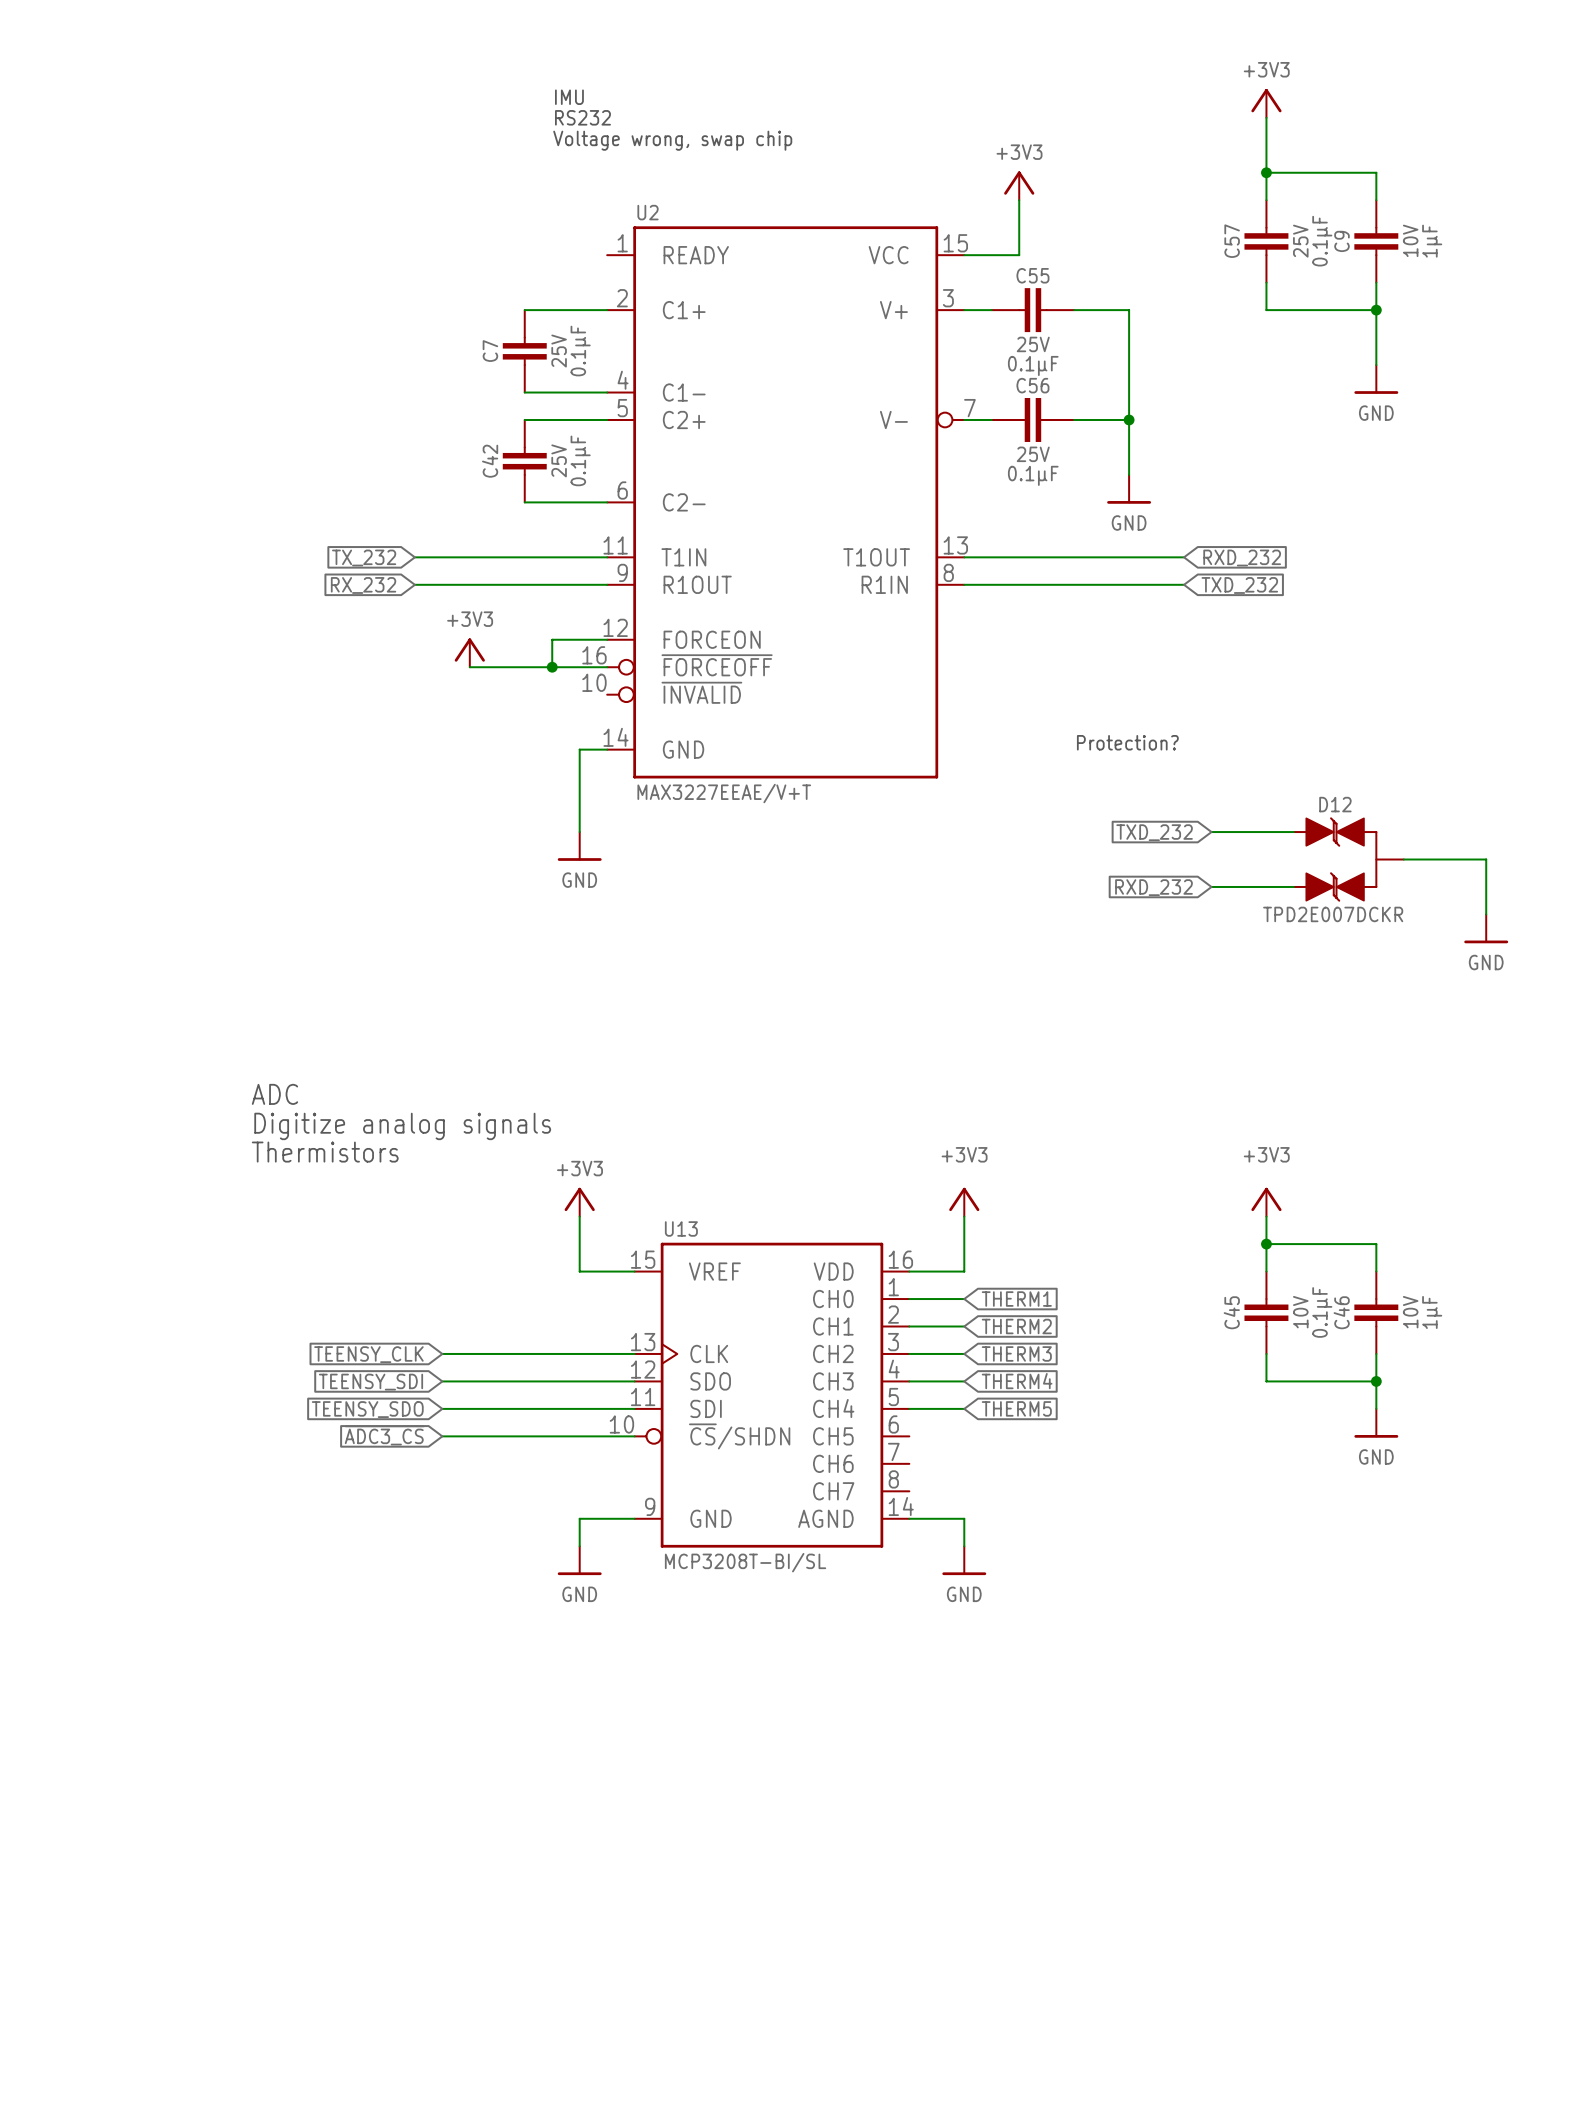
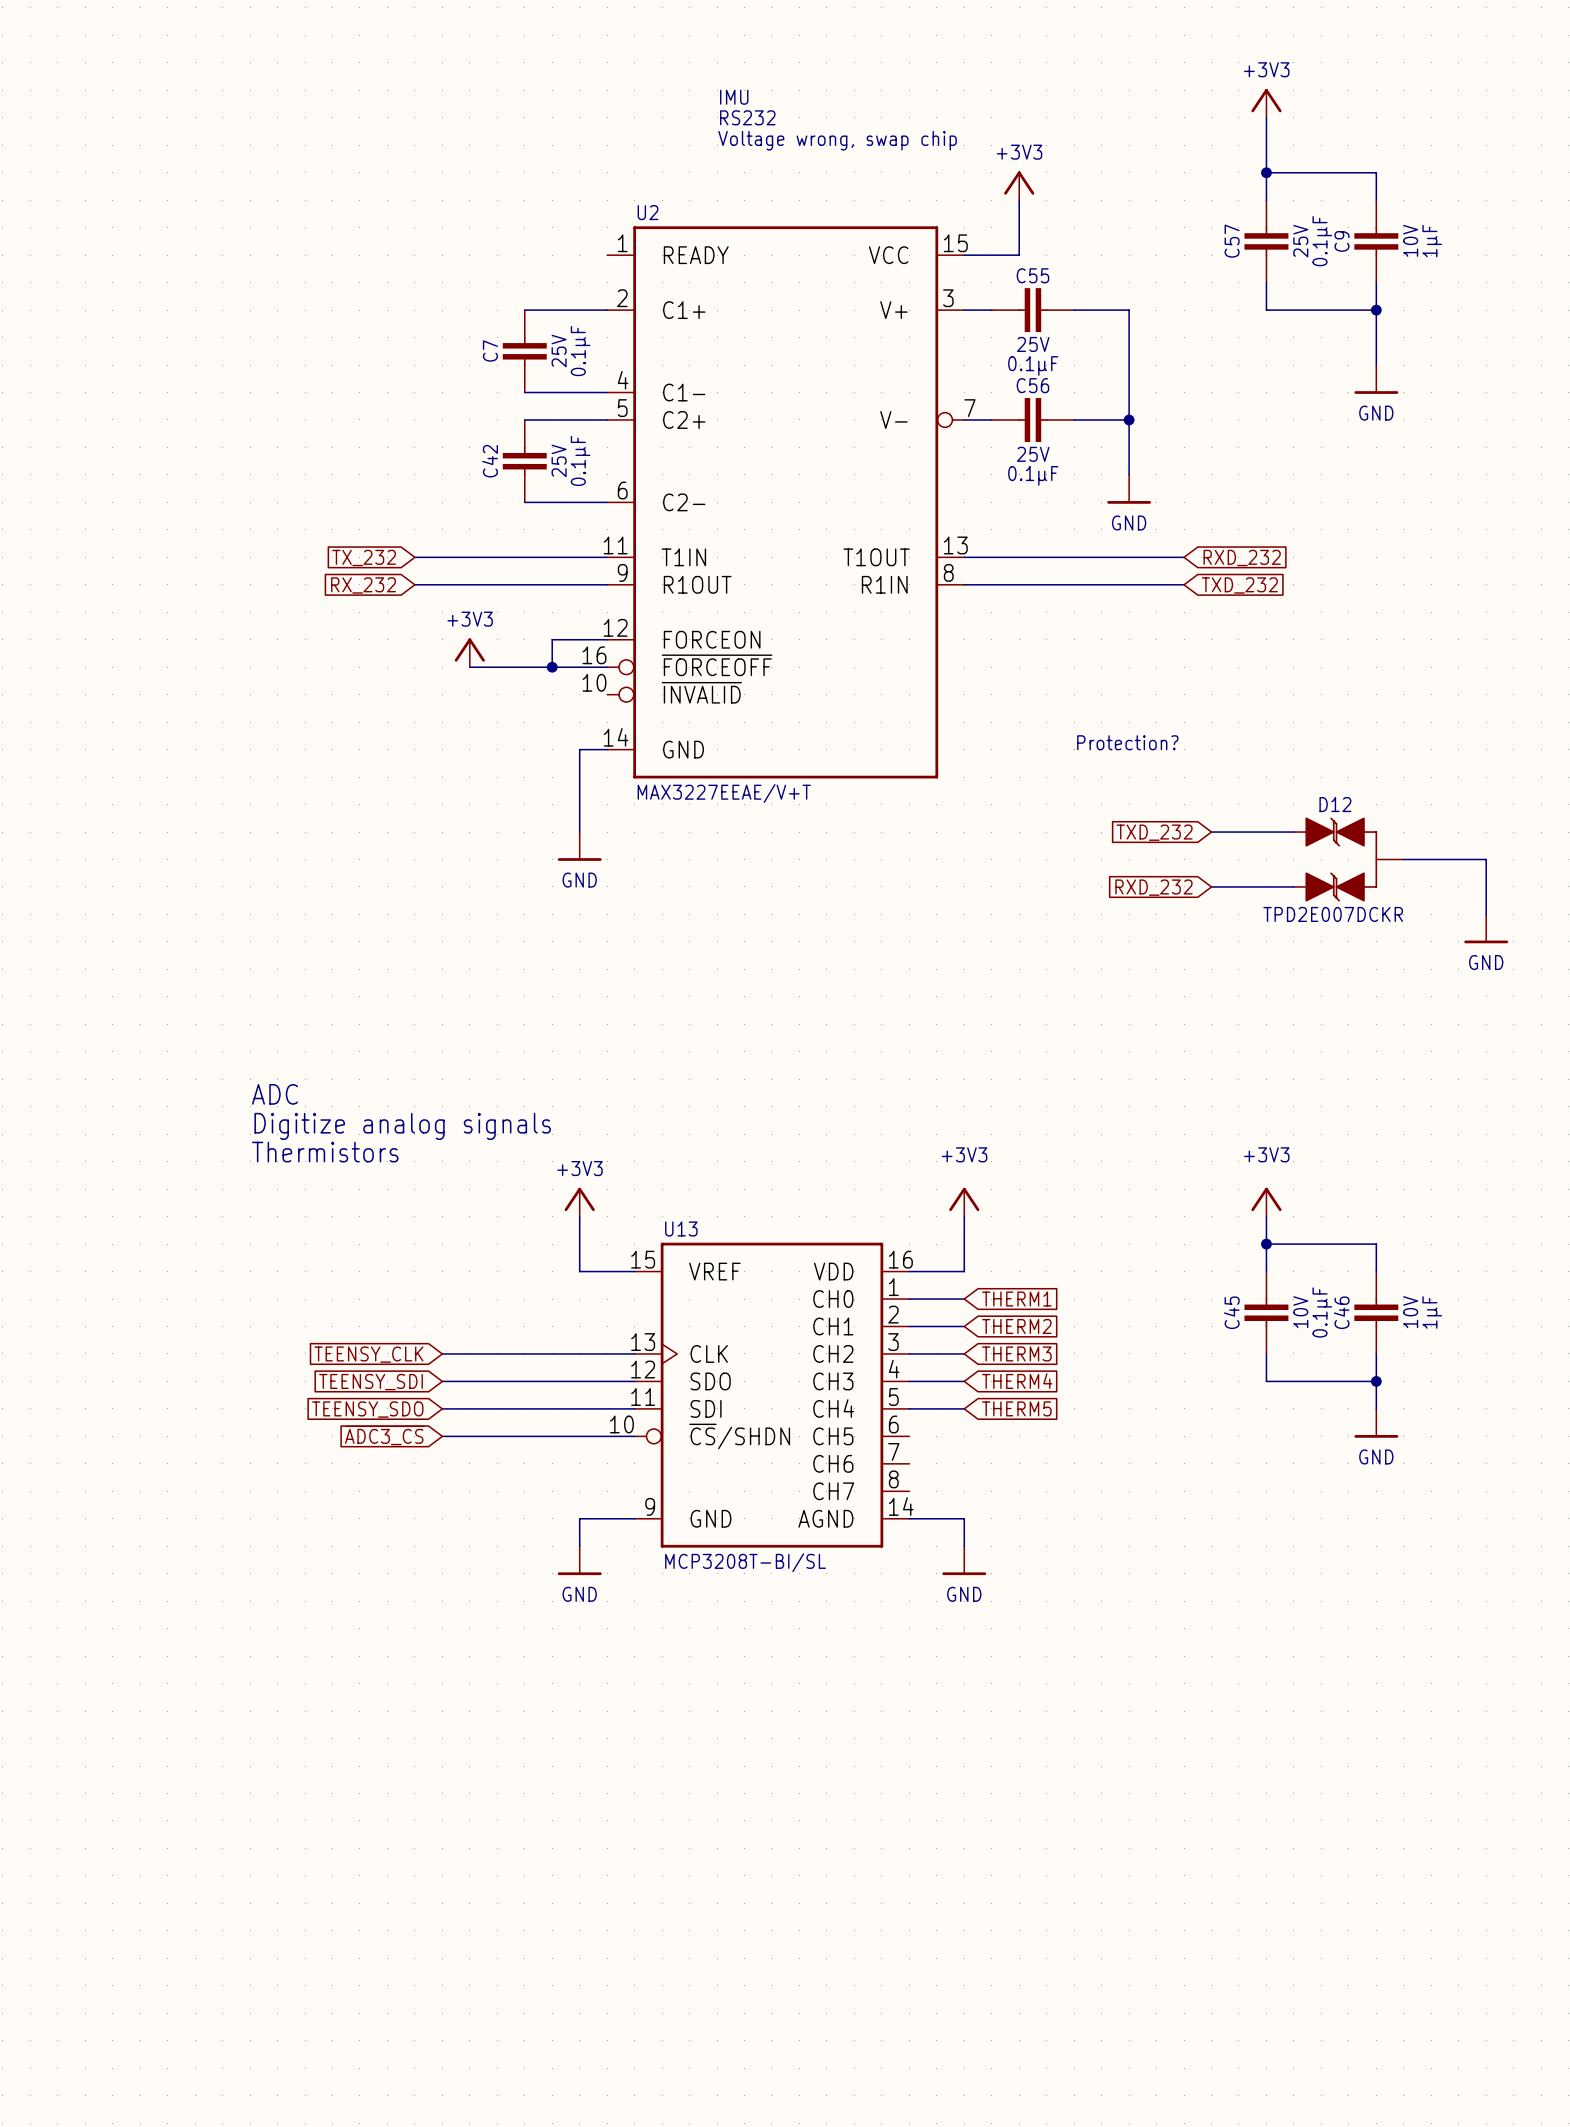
text position: IMU (569, 97) -> IMU (734, 97)
text position: RS232 (582, 117) -> RS232 (747, 117)
text position: Voltage wrong, swap chip (672, 140) -> Voltage wrong, swap chip (837, 140)

